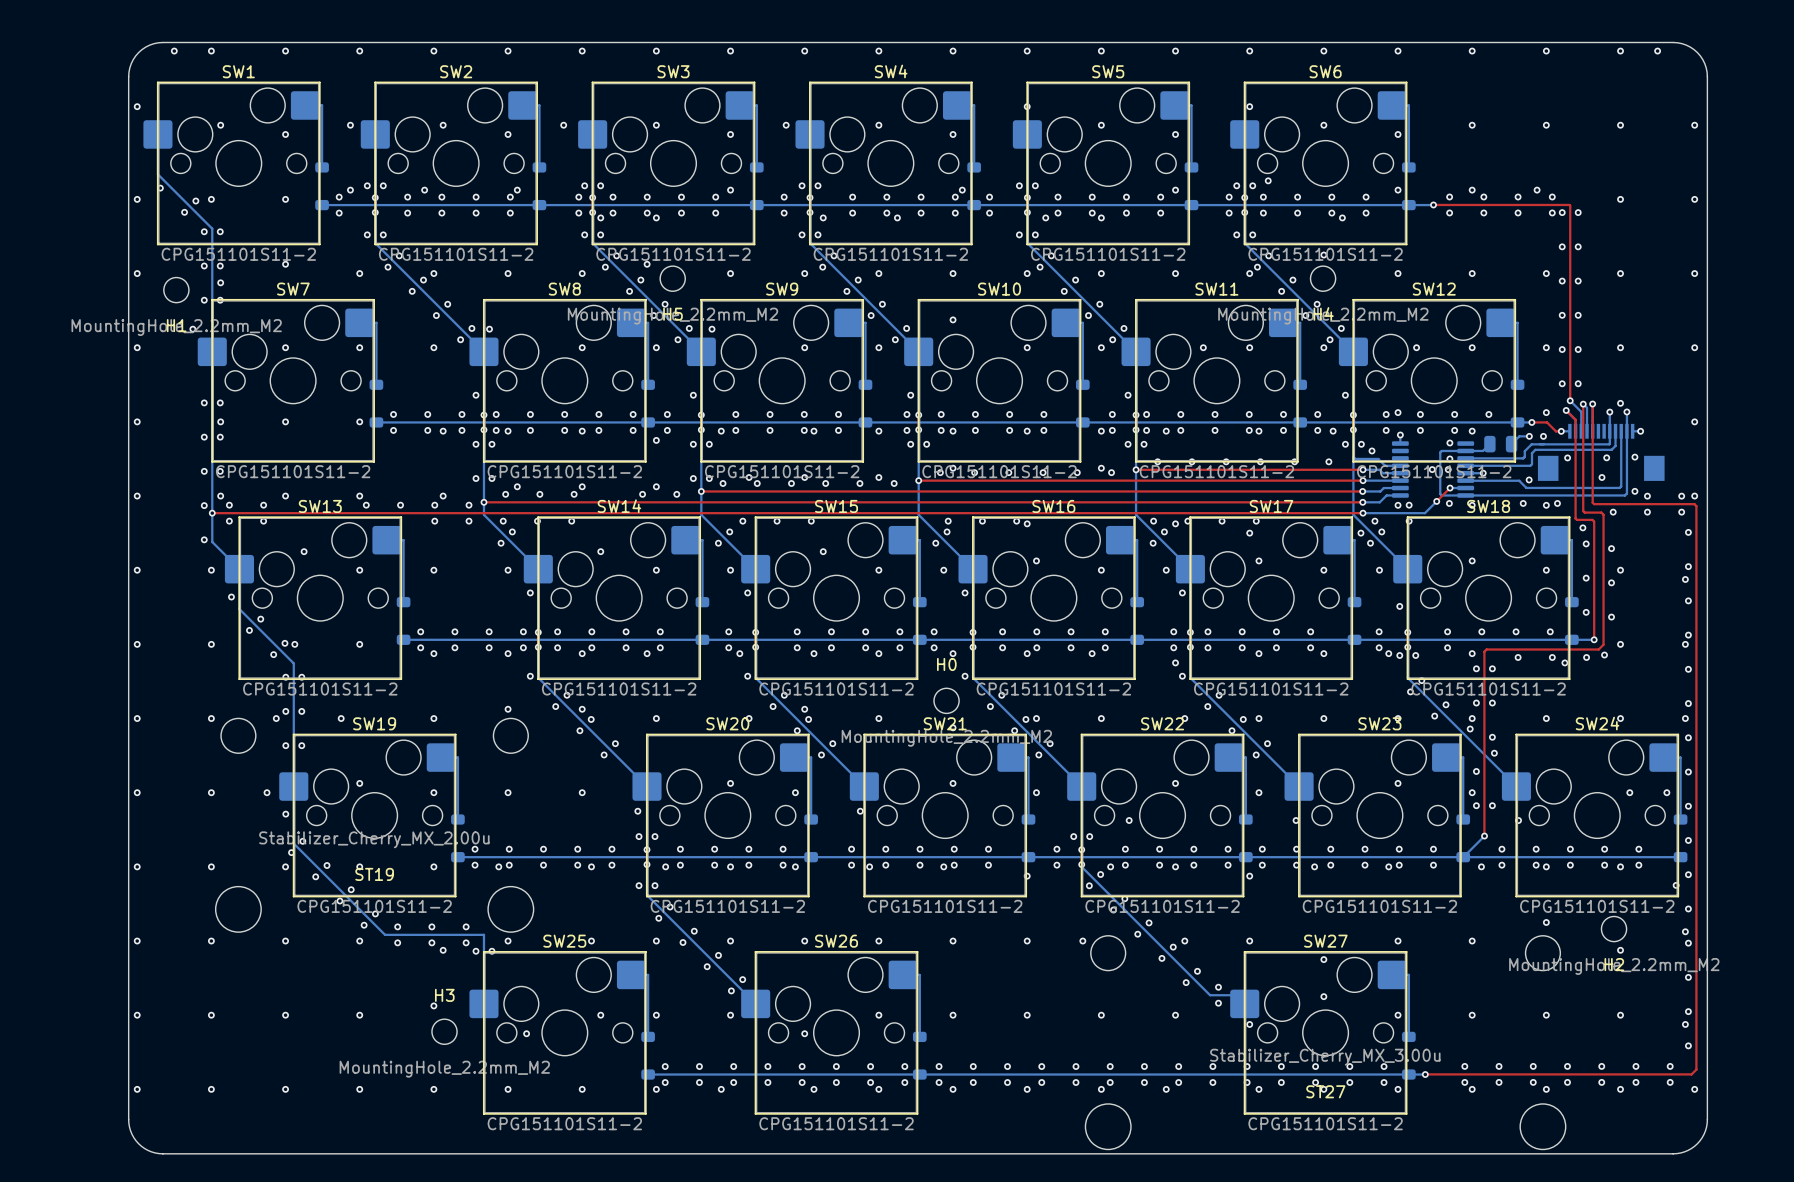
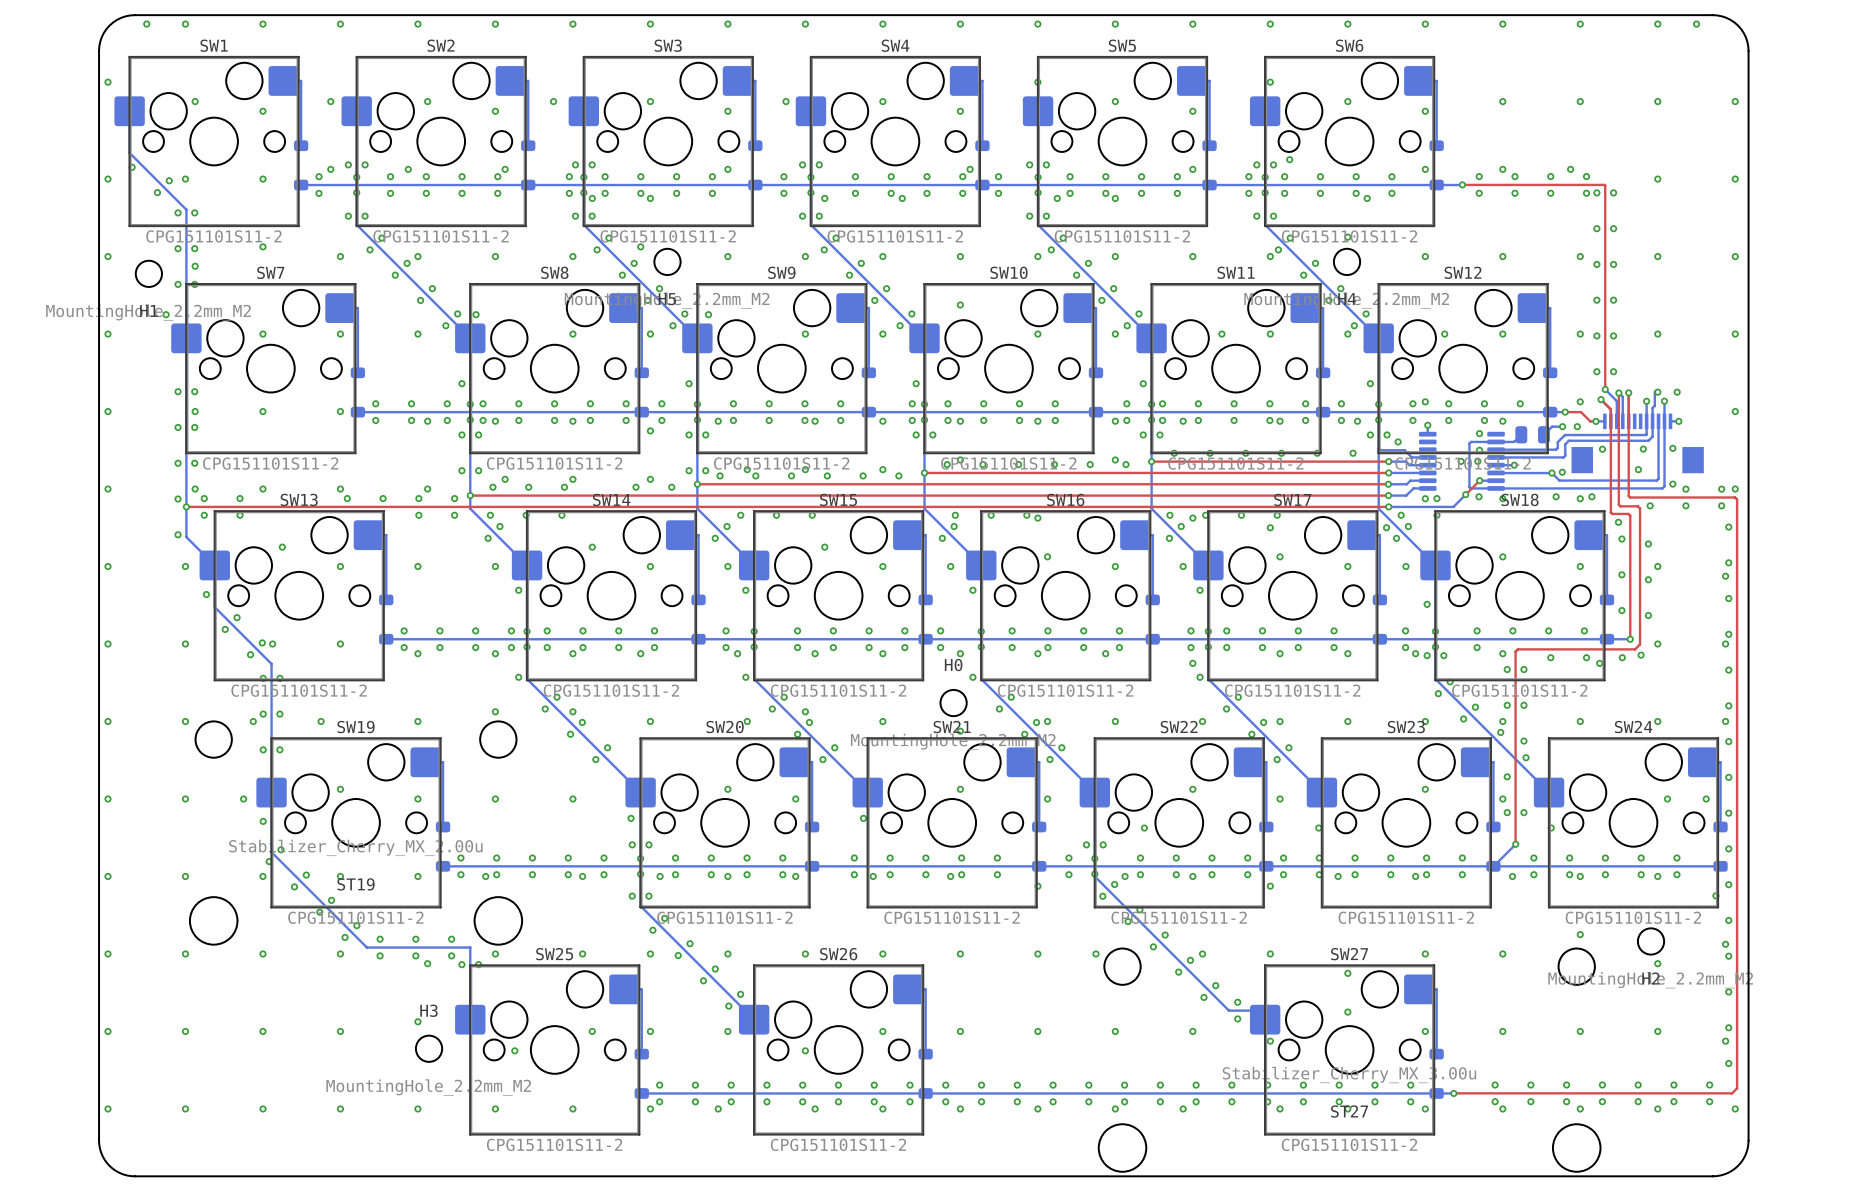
bottom track: none -> (1654, 391) (1652, 421)
via: none -> (1677, 392)
via: none -> (1551, 473)

